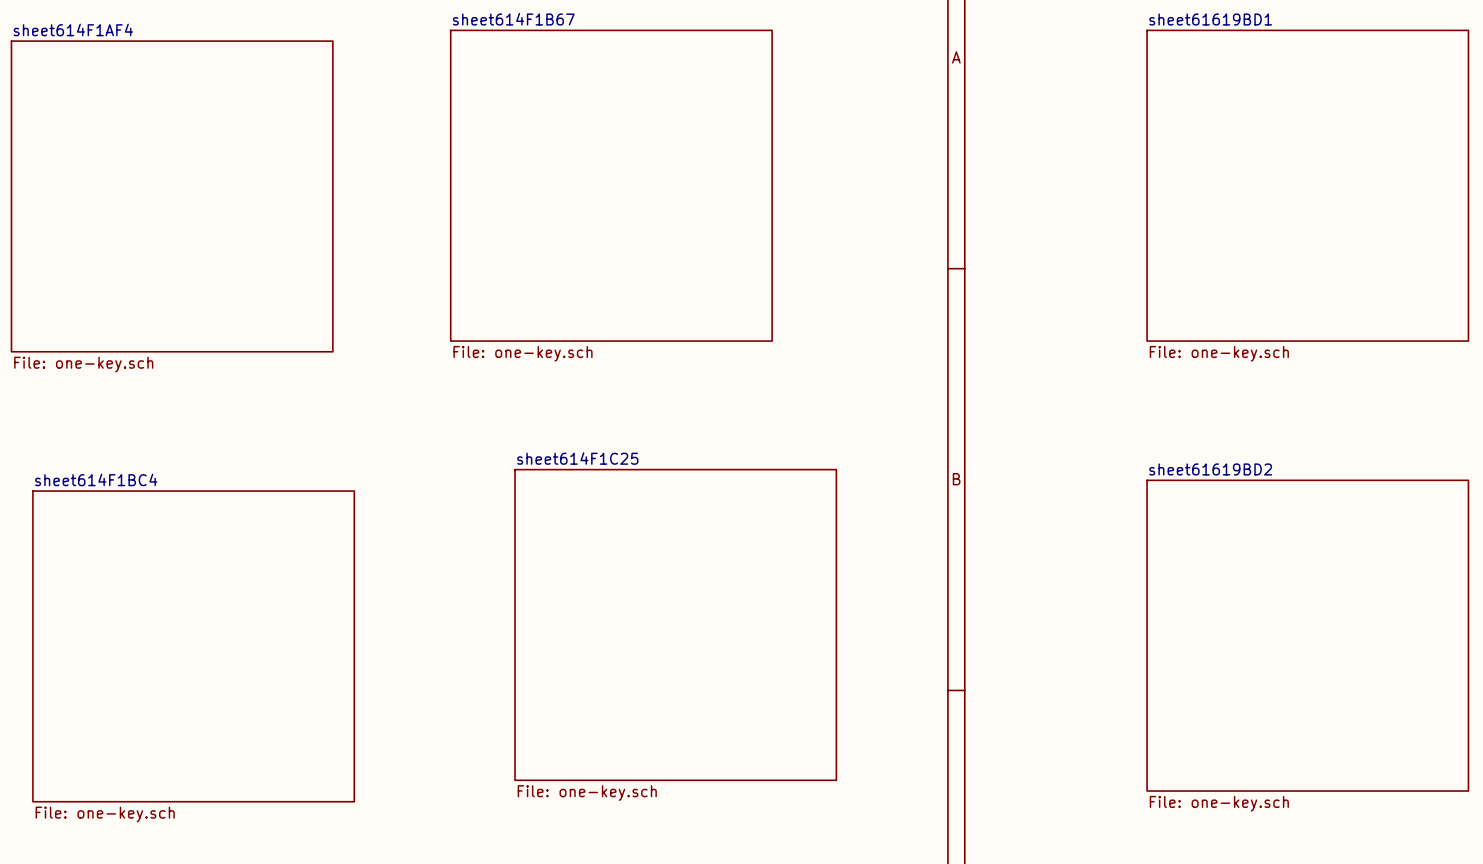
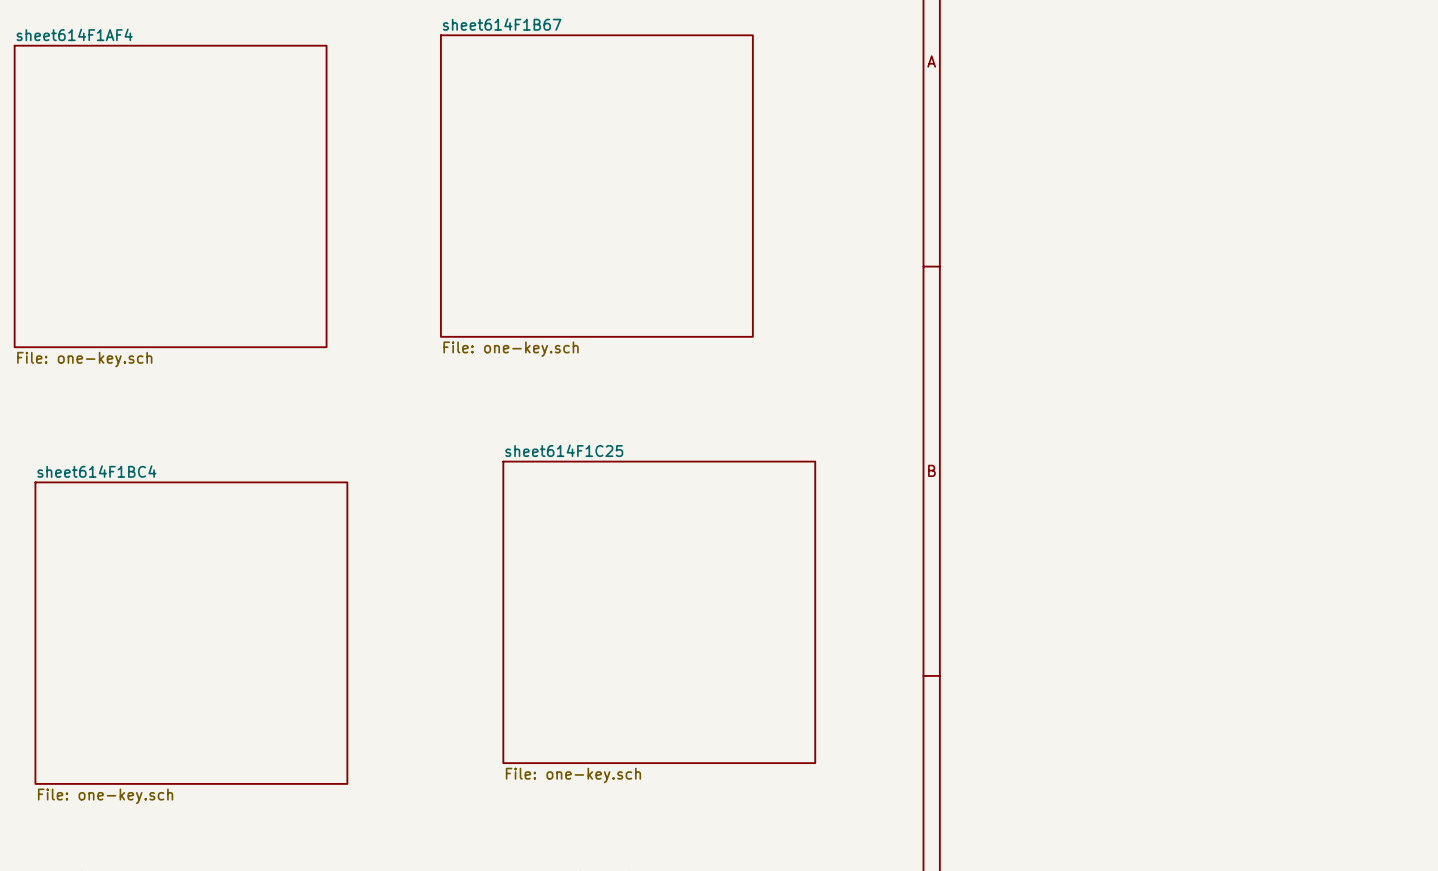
sheet sheet61619BD1: File: one-key.sch (1307, 185) -> none
sheet sheet61619BD2: File: one-key.sch (1307, 635) -> none

